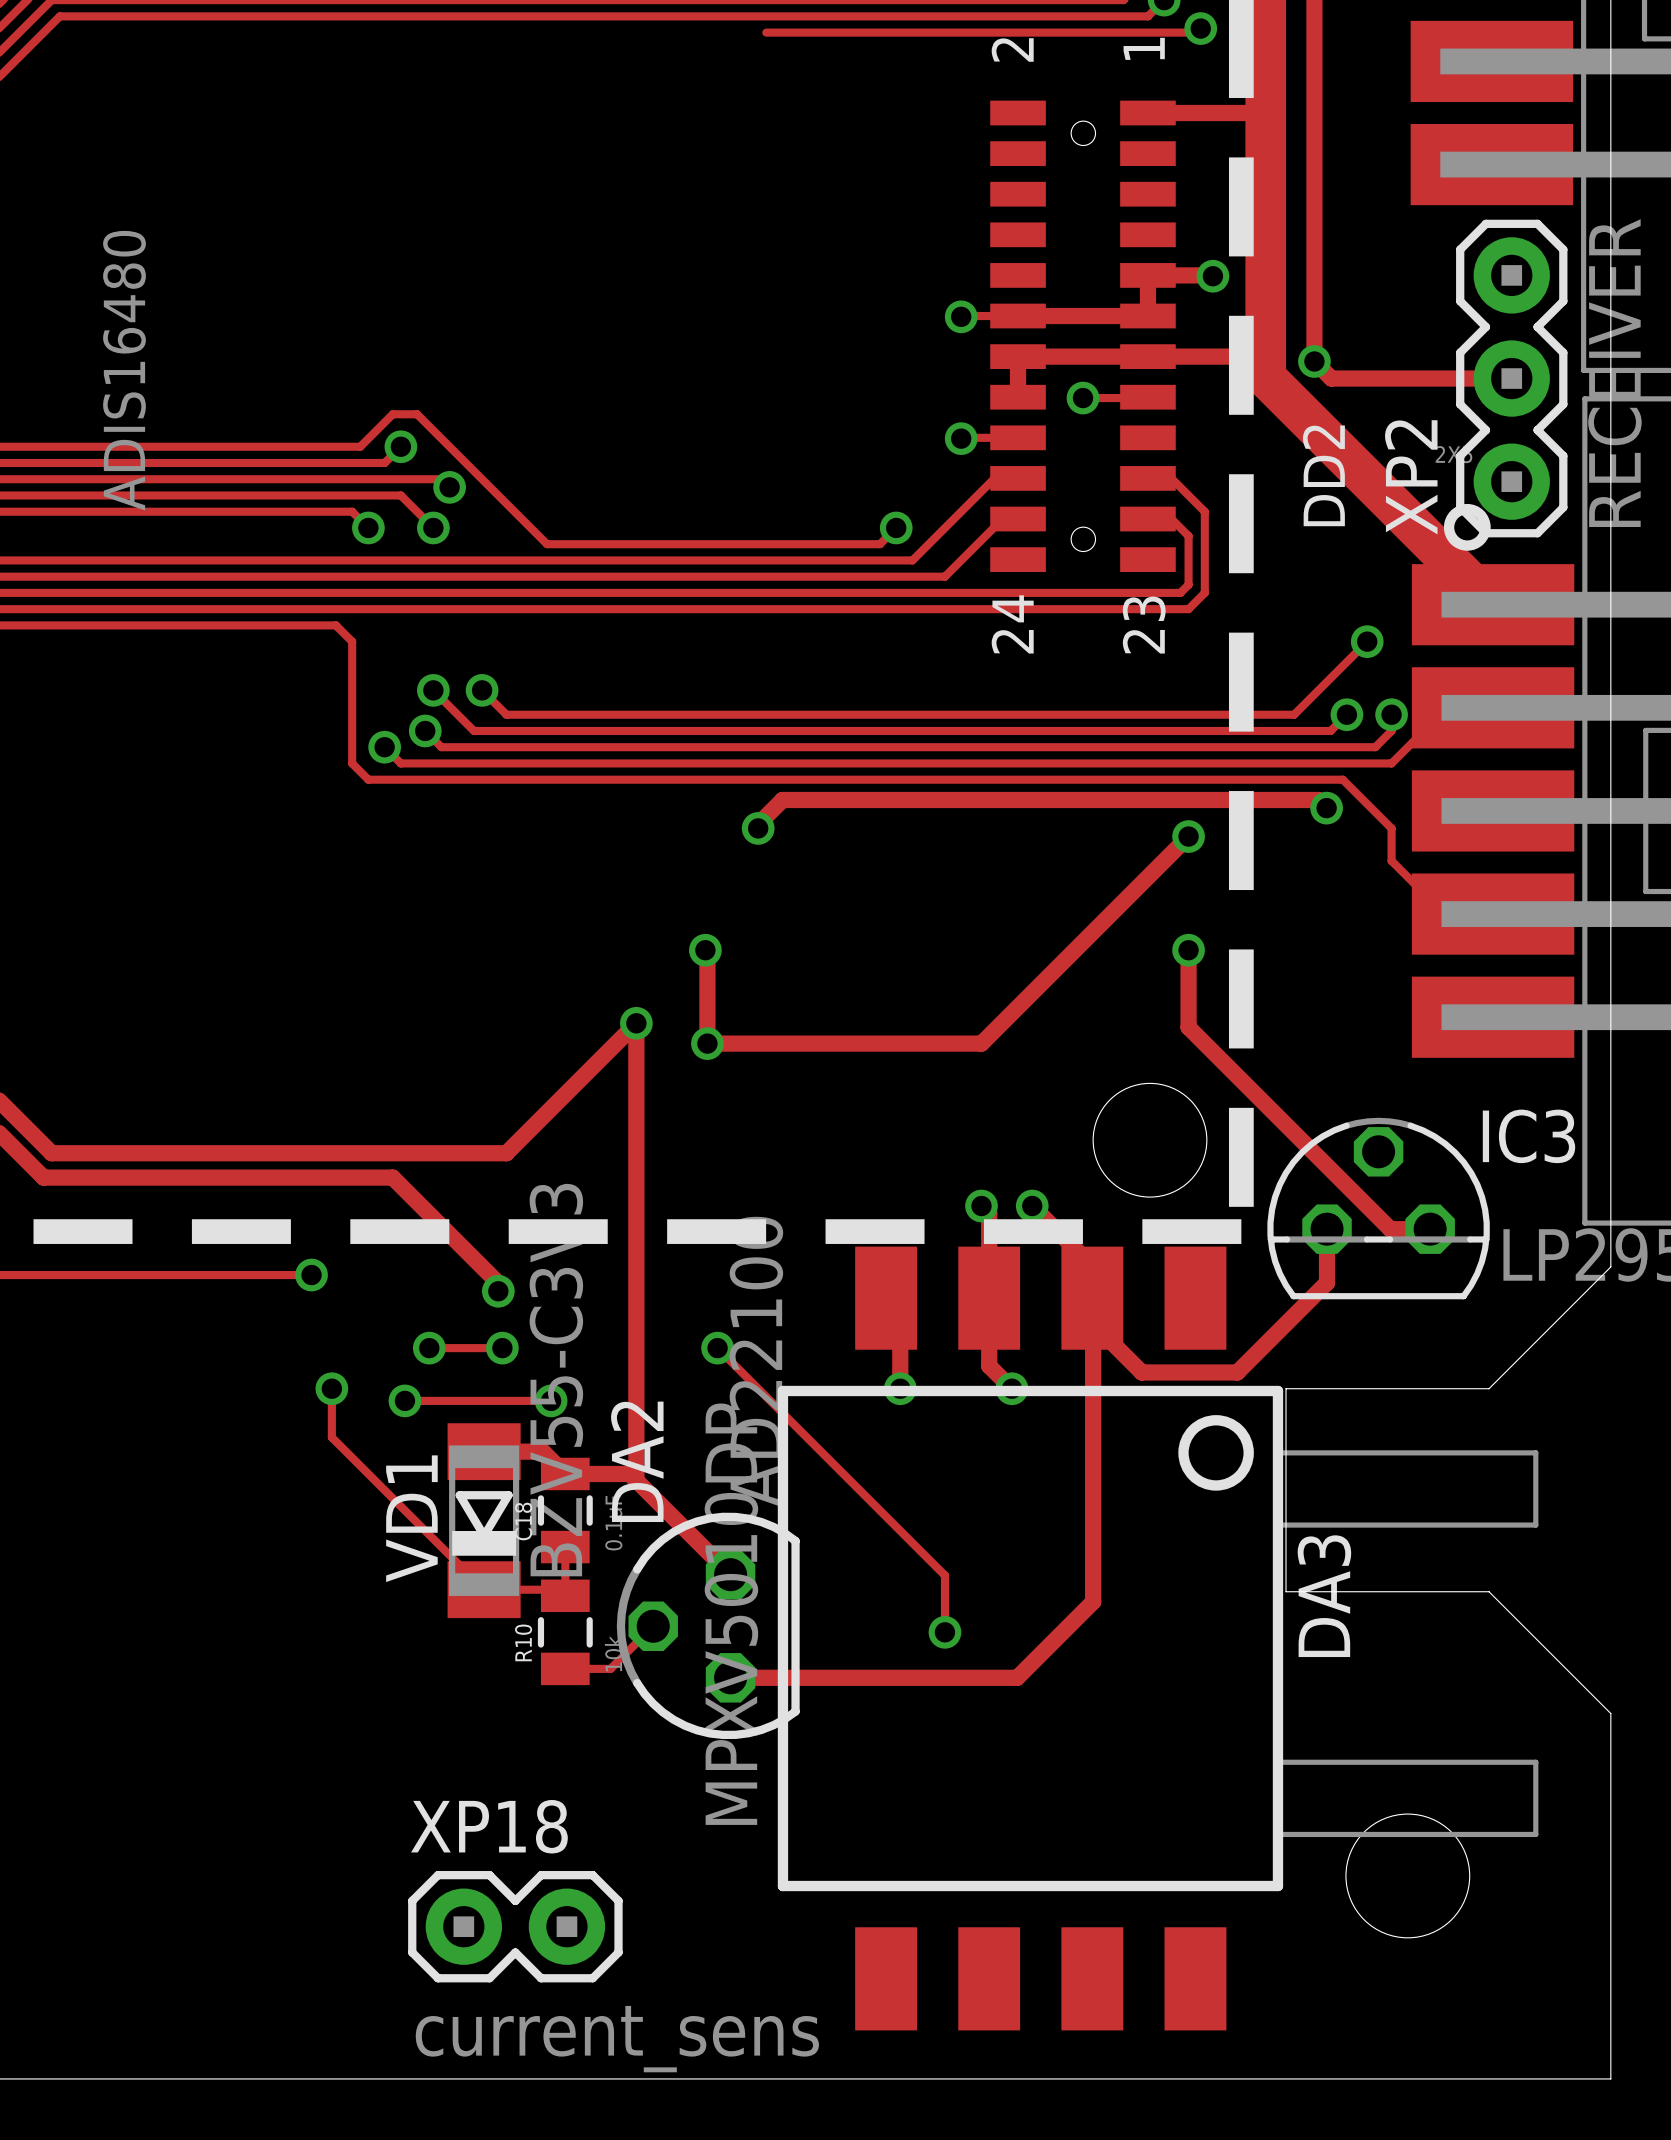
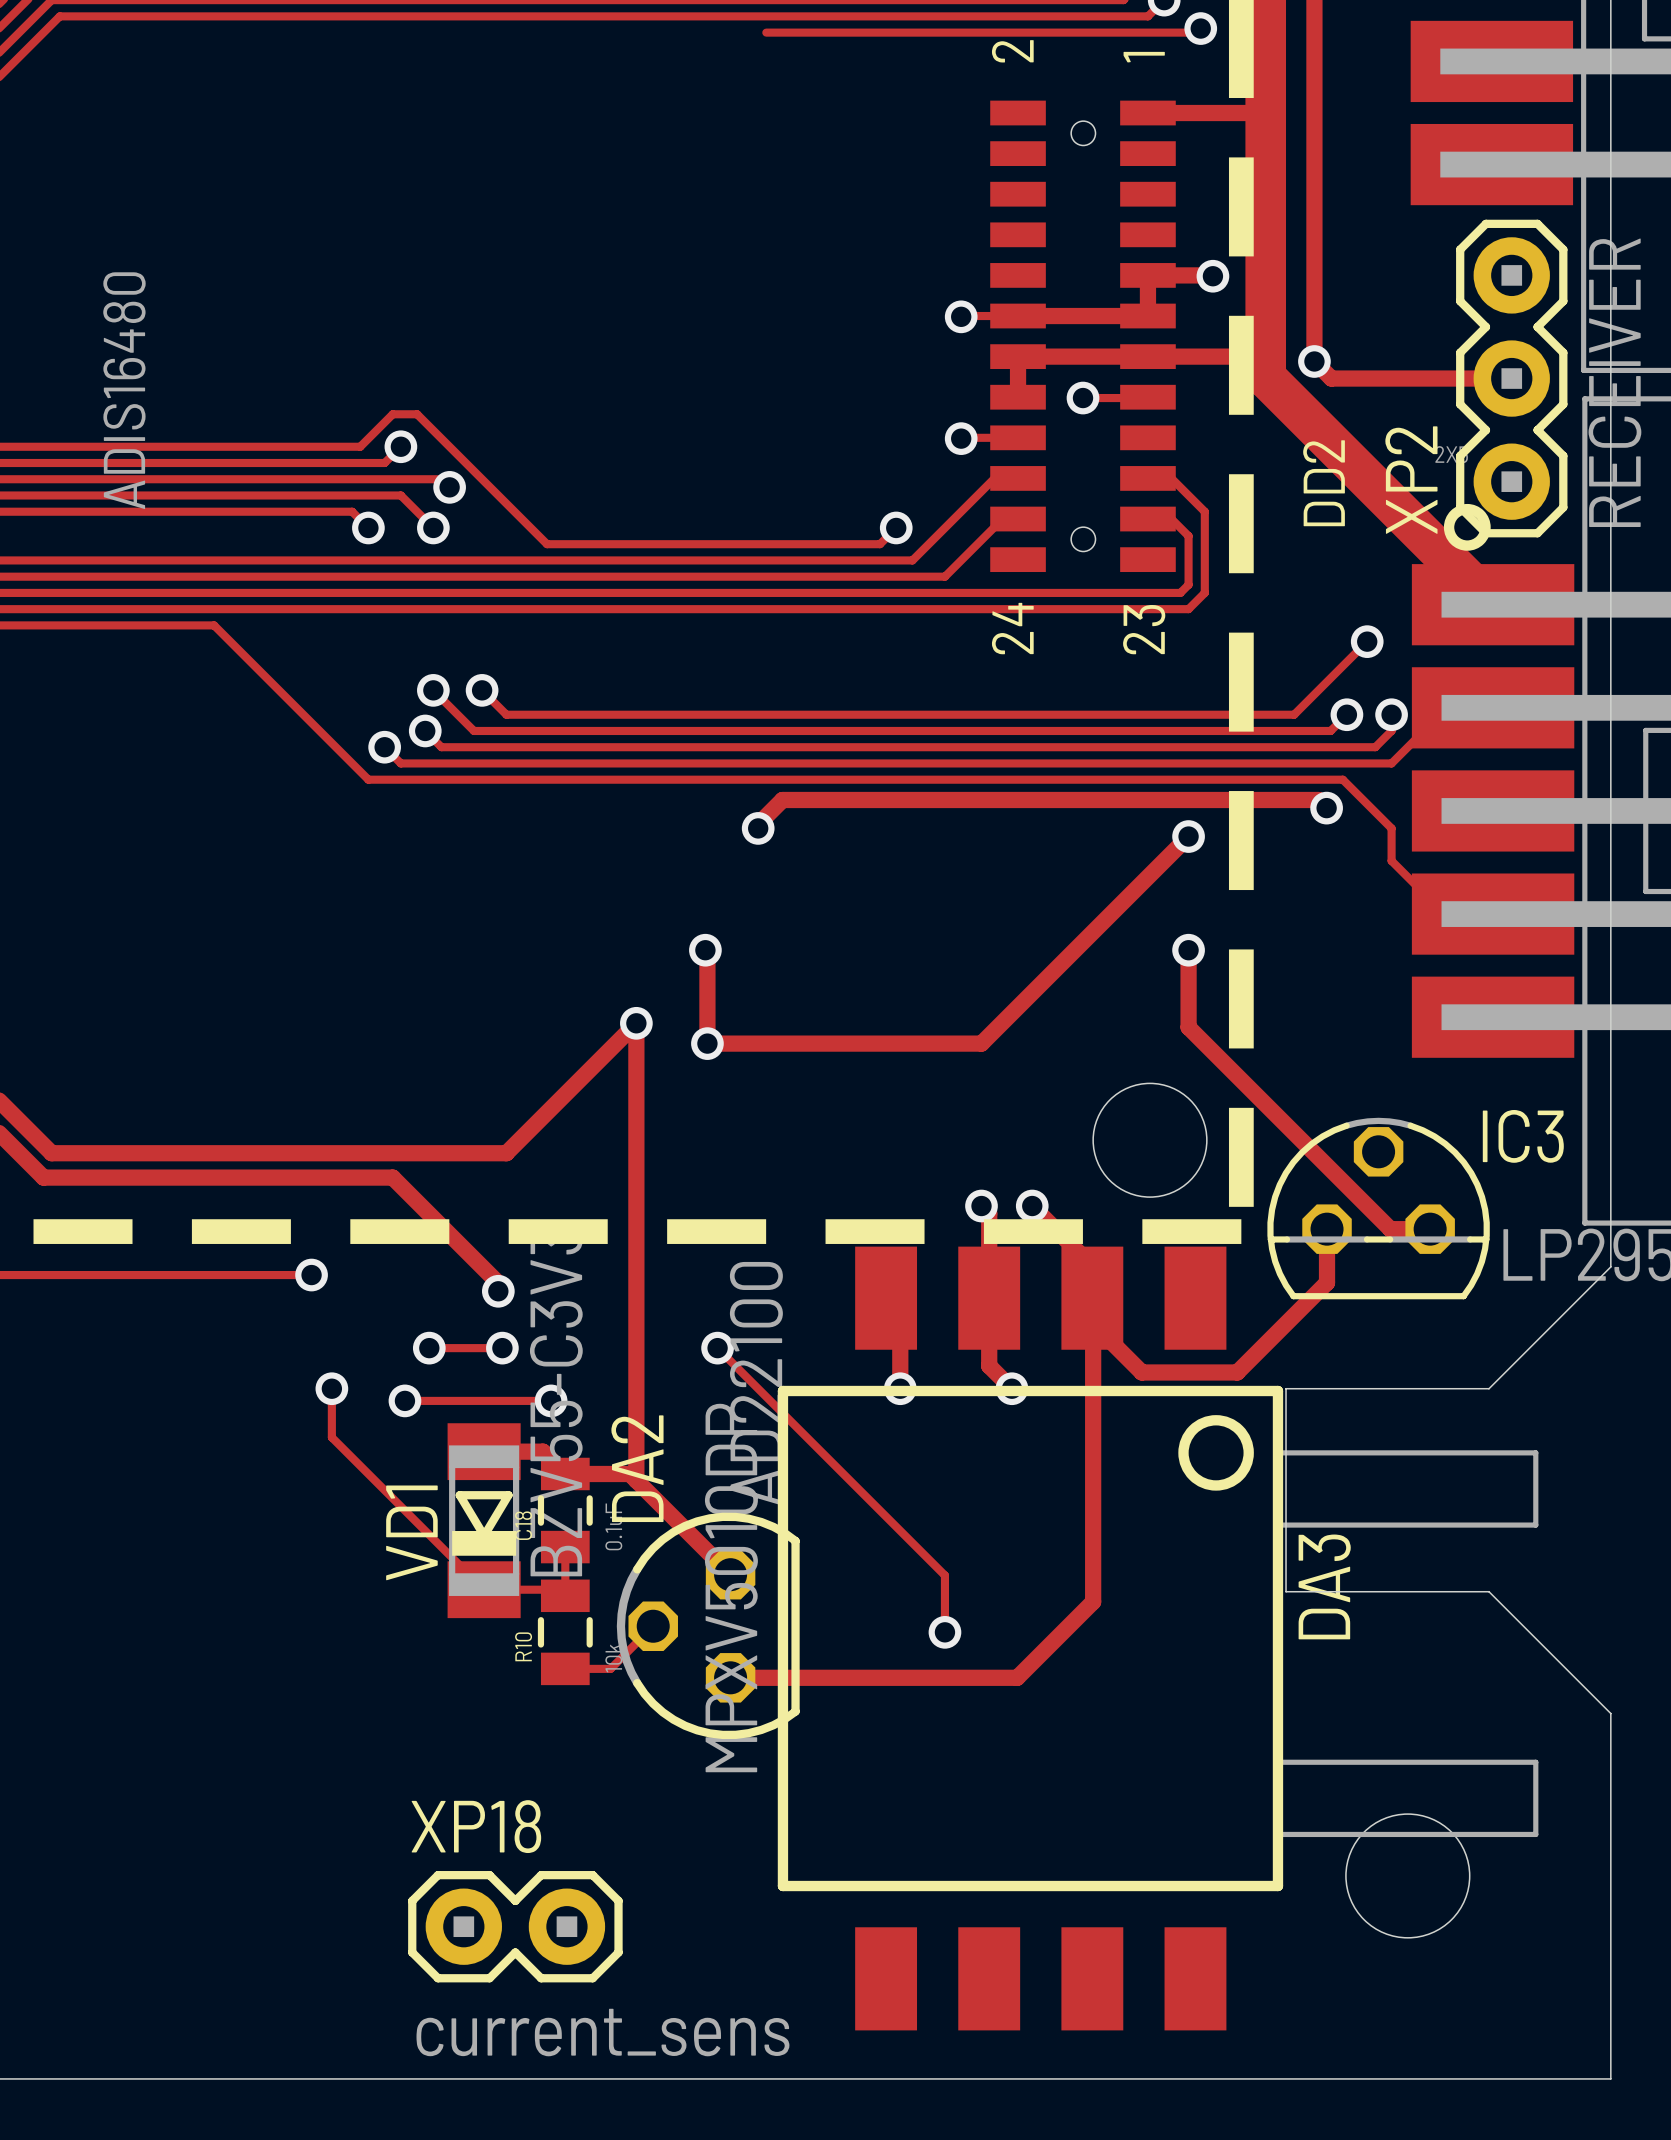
track: (214, 625) (335, 625) (352, 641) (352, 763) -> (214, 625) (352, 763)

